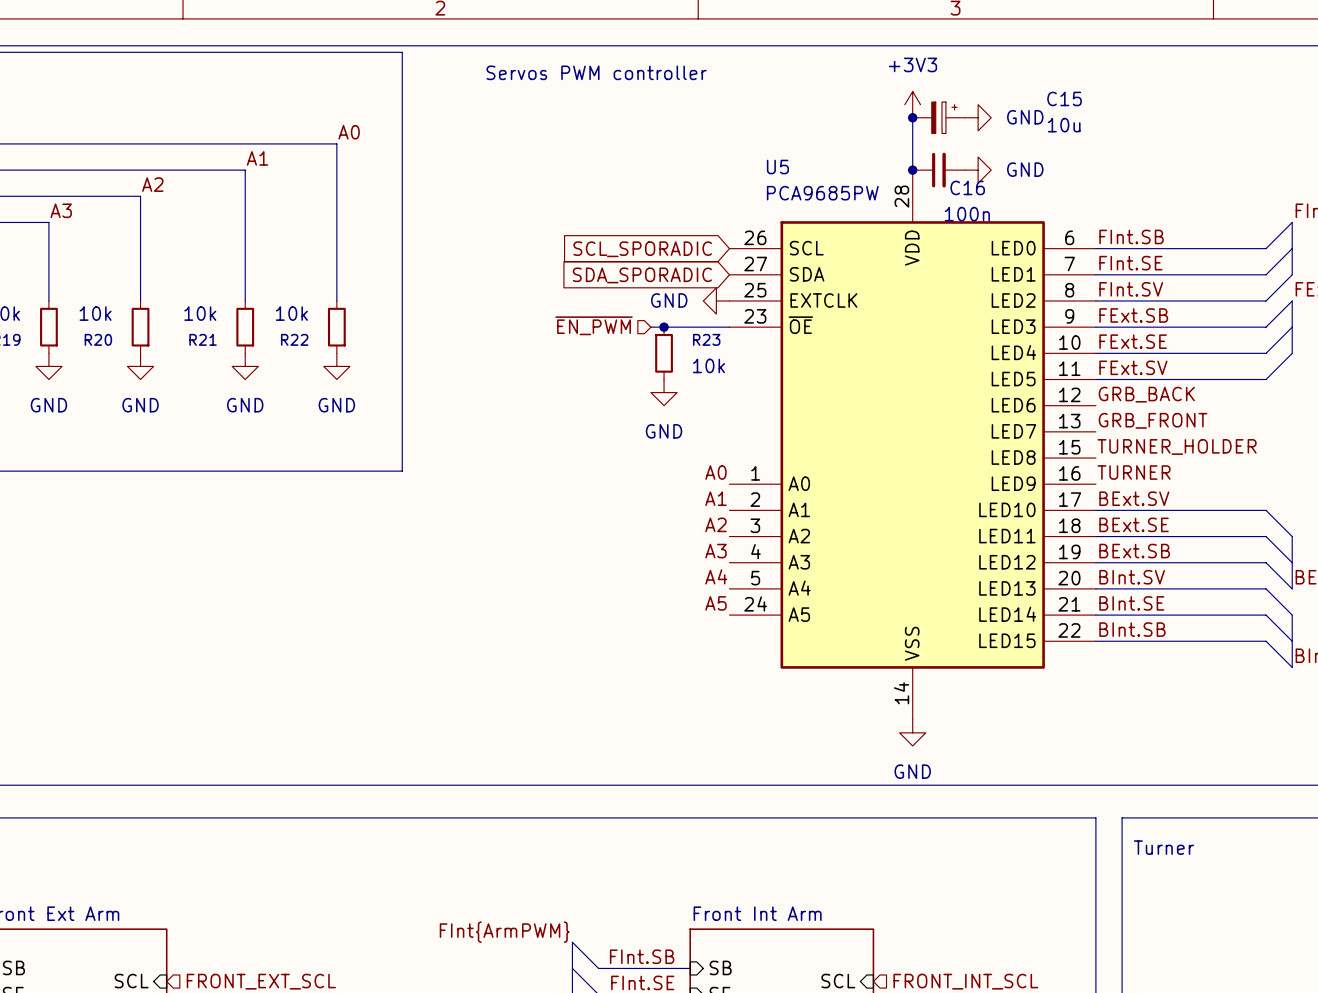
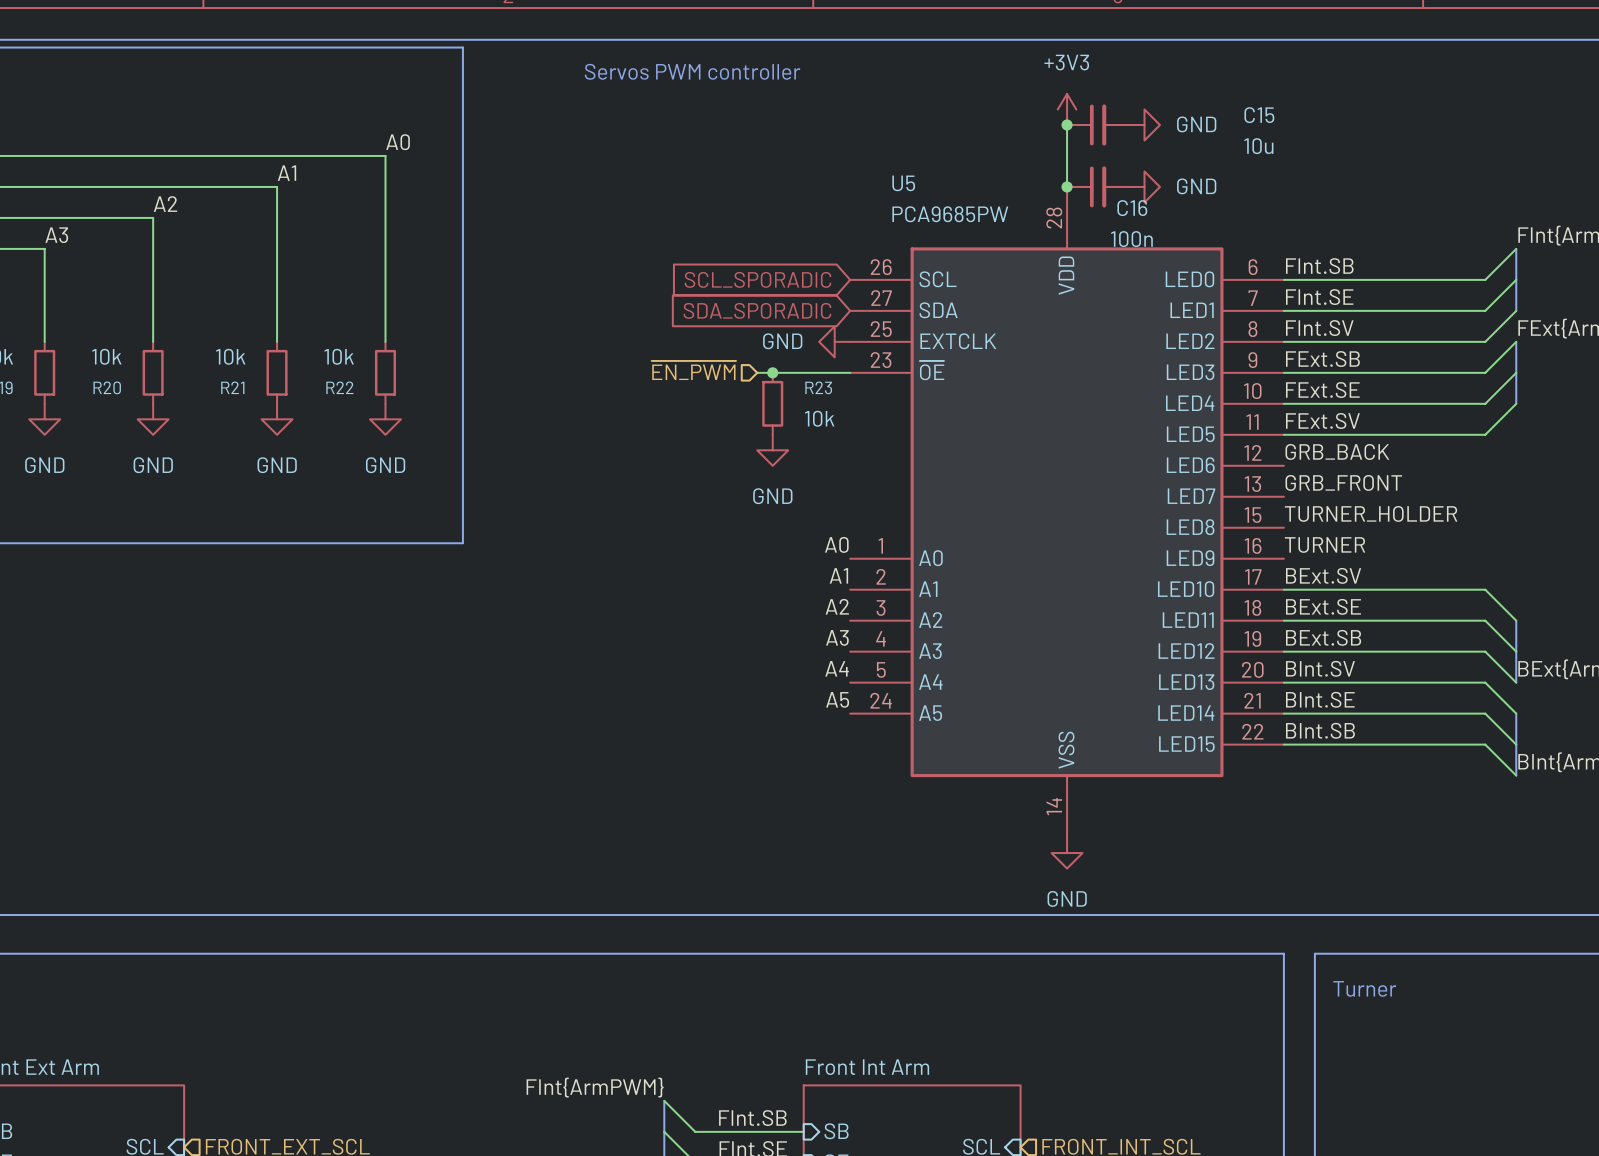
C15 symbol: [912, 102, 966, 134] -> [1067, 104, 1130, 146]

